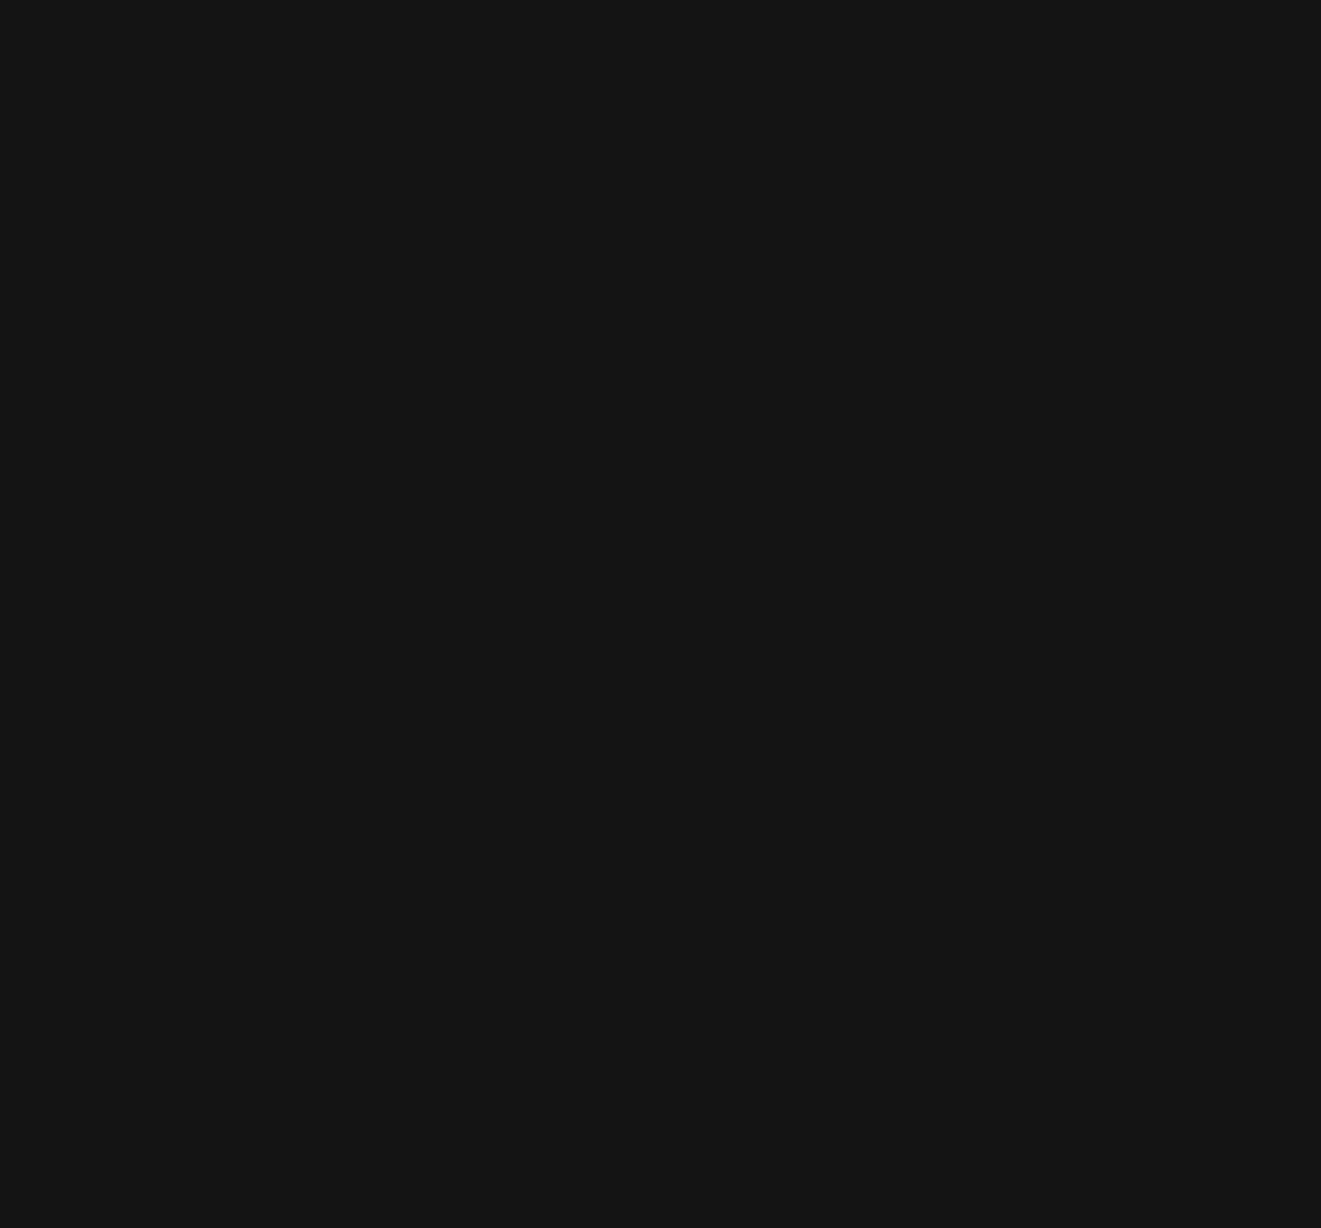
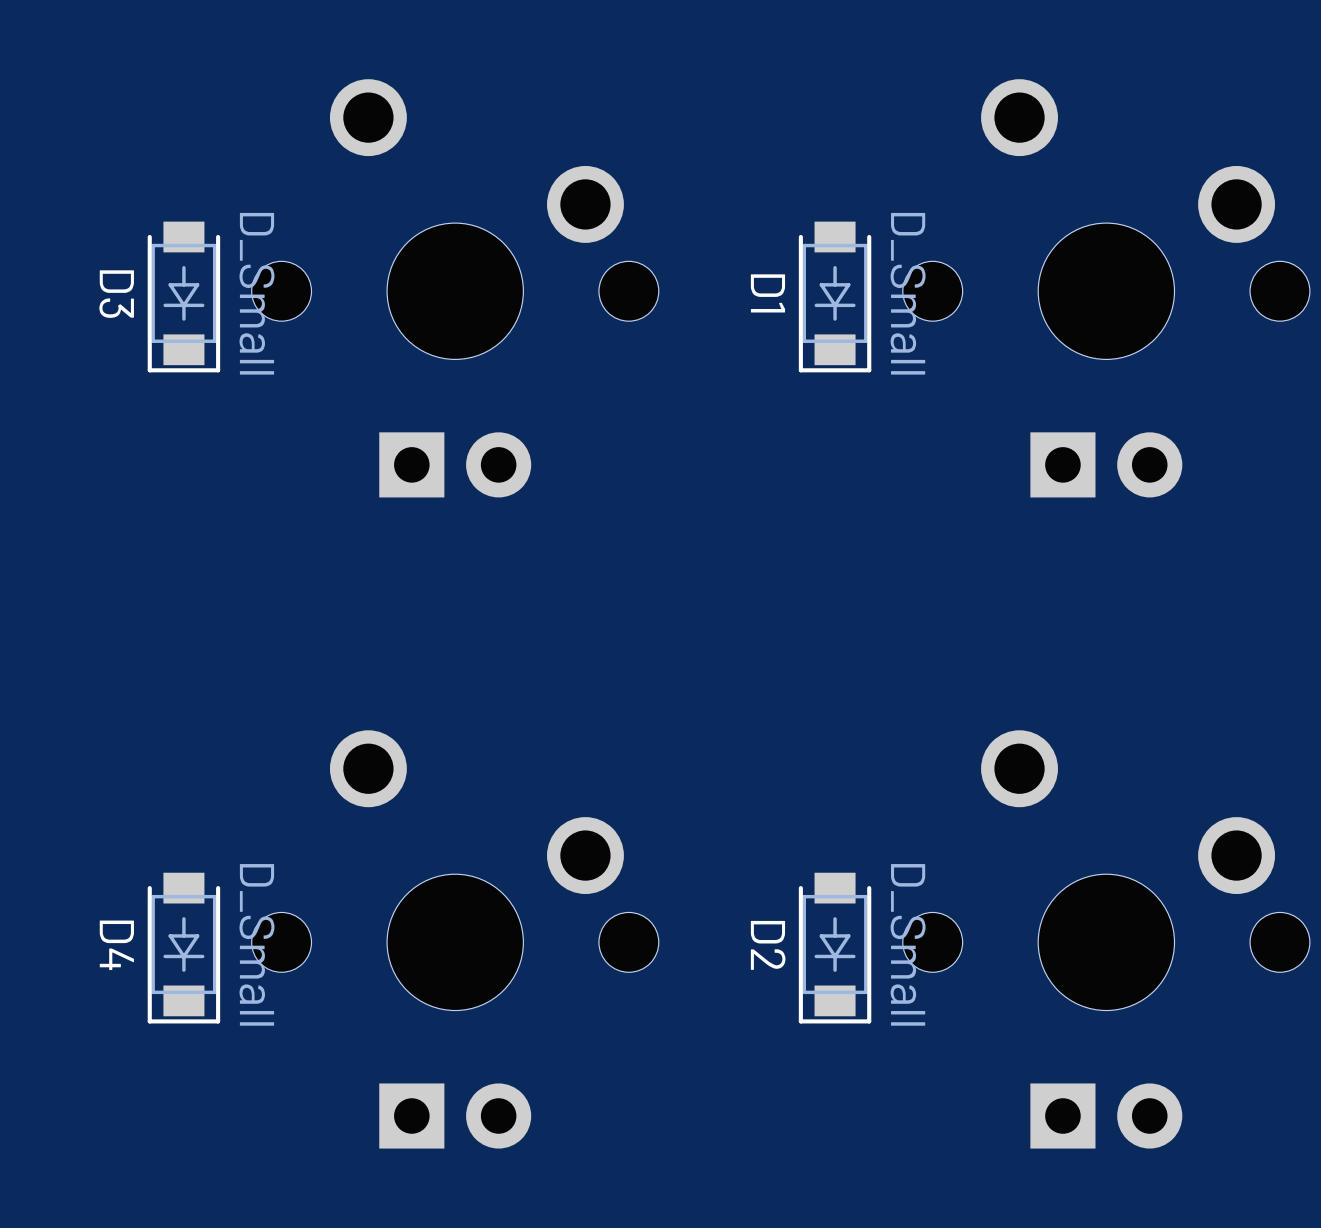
part: none -> (455, 288)
part: none -> (1106, 288)
D3: none -> D_Small (183, 296)
D1: none -> D_Small (835, 296)
part: none -> (455, 939)
part: none -> (1106, 939)
D4: none -> D_Small (183, 948)
D2: none -> D_Small (835, 948)

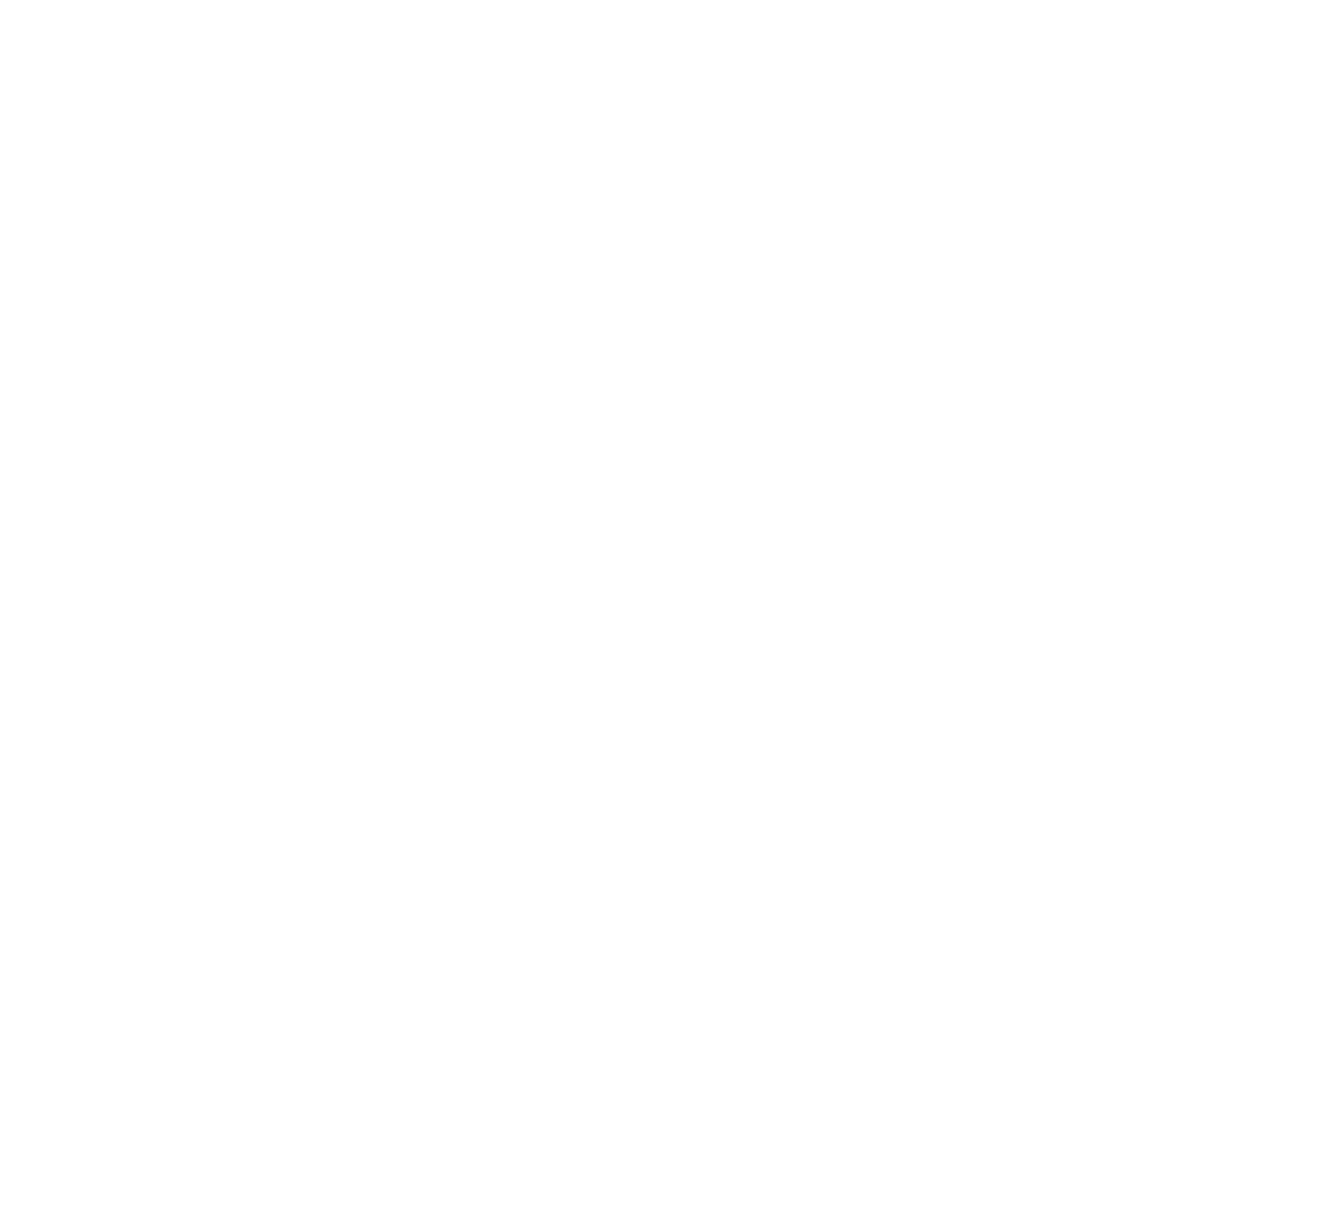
part: (455, 288) -> none
part: (1106, 288) -> none
D3: D_Small (183, 296) -> none
D1: D_Small (835, 296) -> none
part: (455, 939) -> none
part: (1106, 939) -> none
D4: D_Small (183, 948) -> none
D2: D_Small (835, 948) -> none

